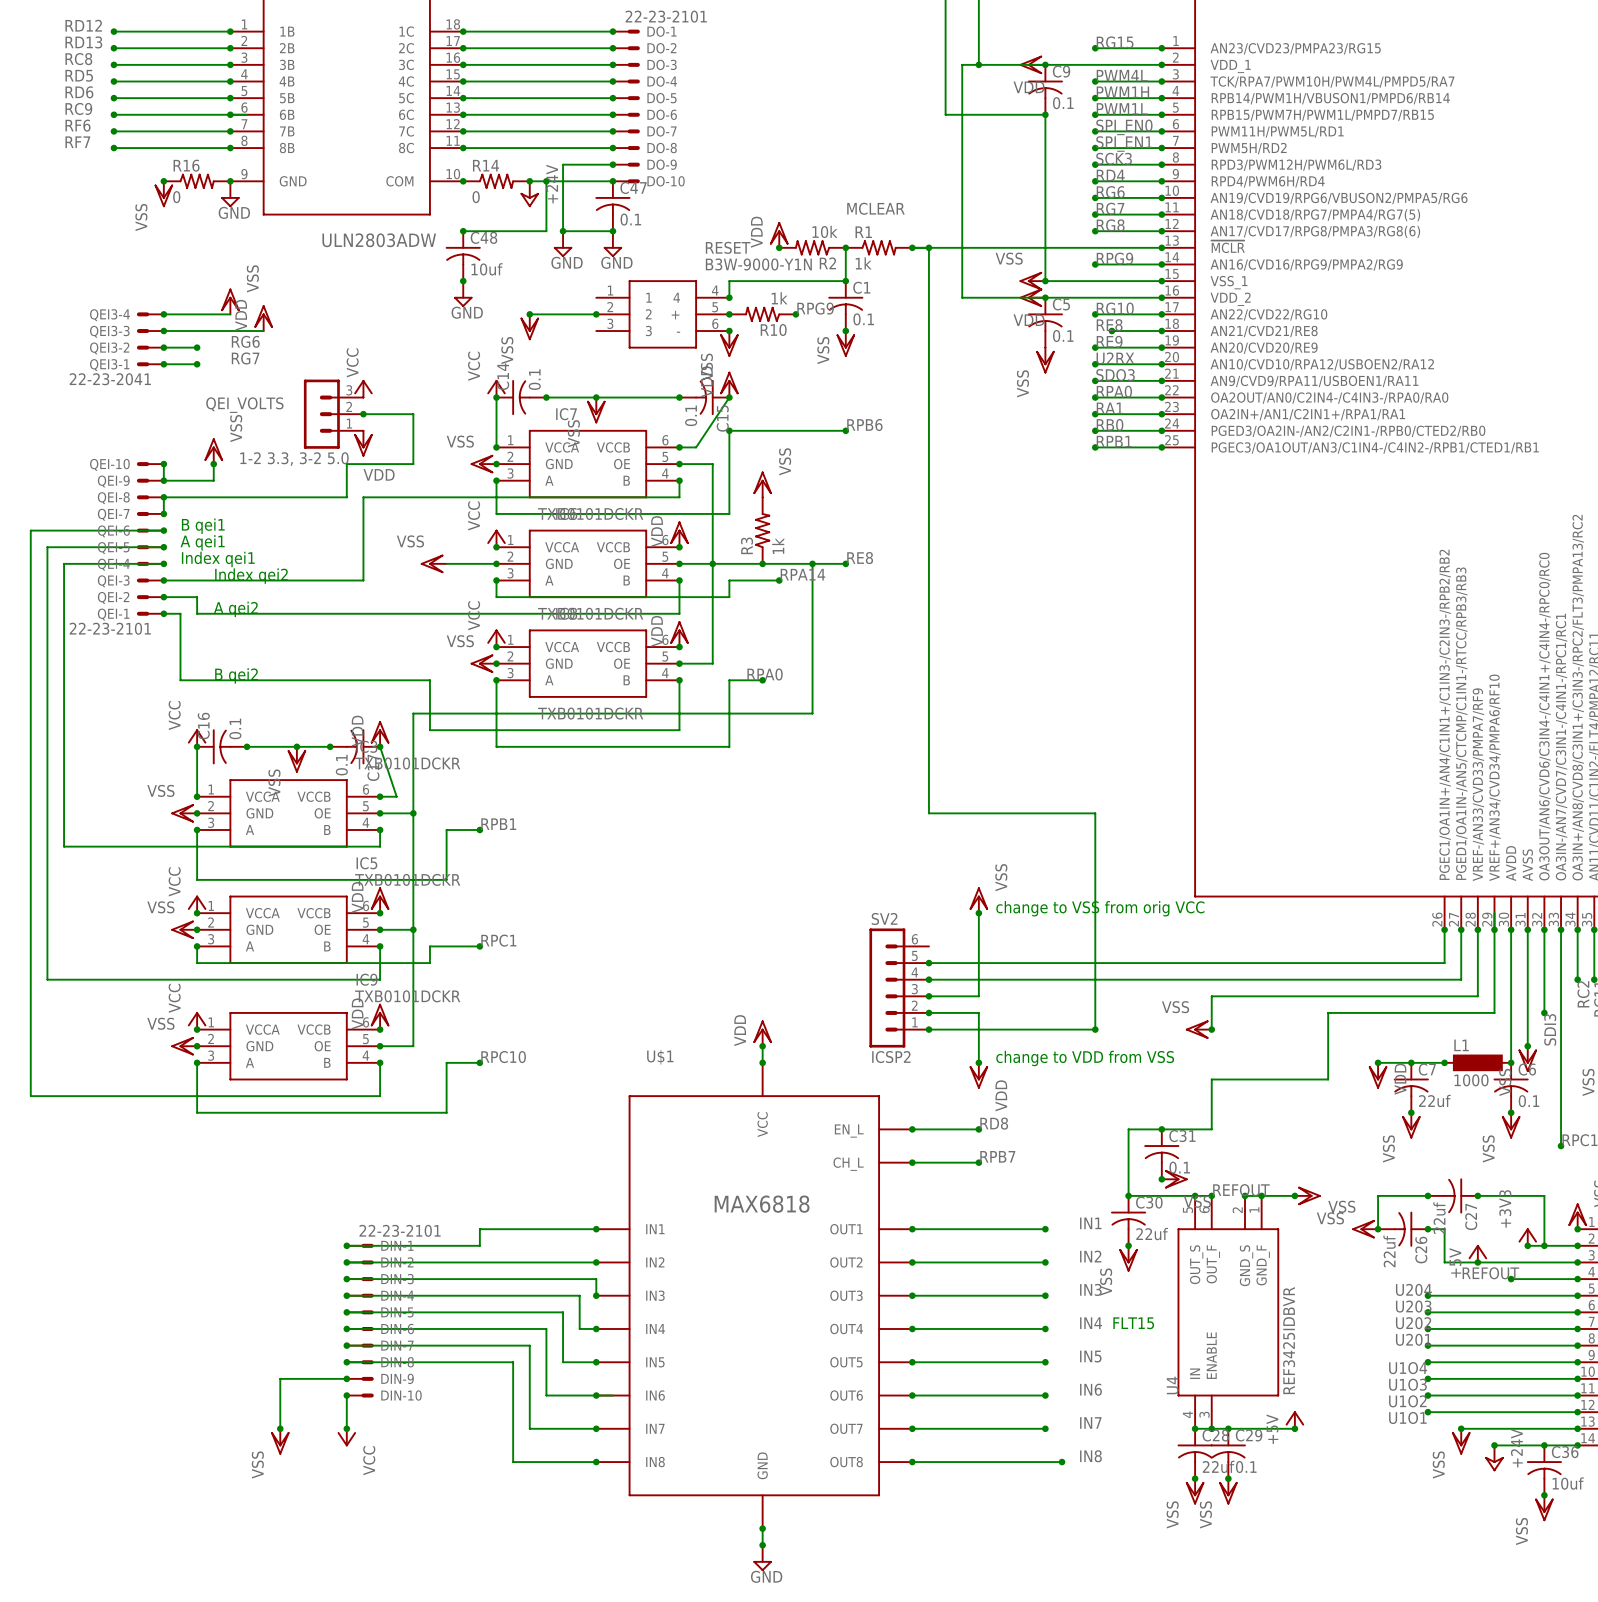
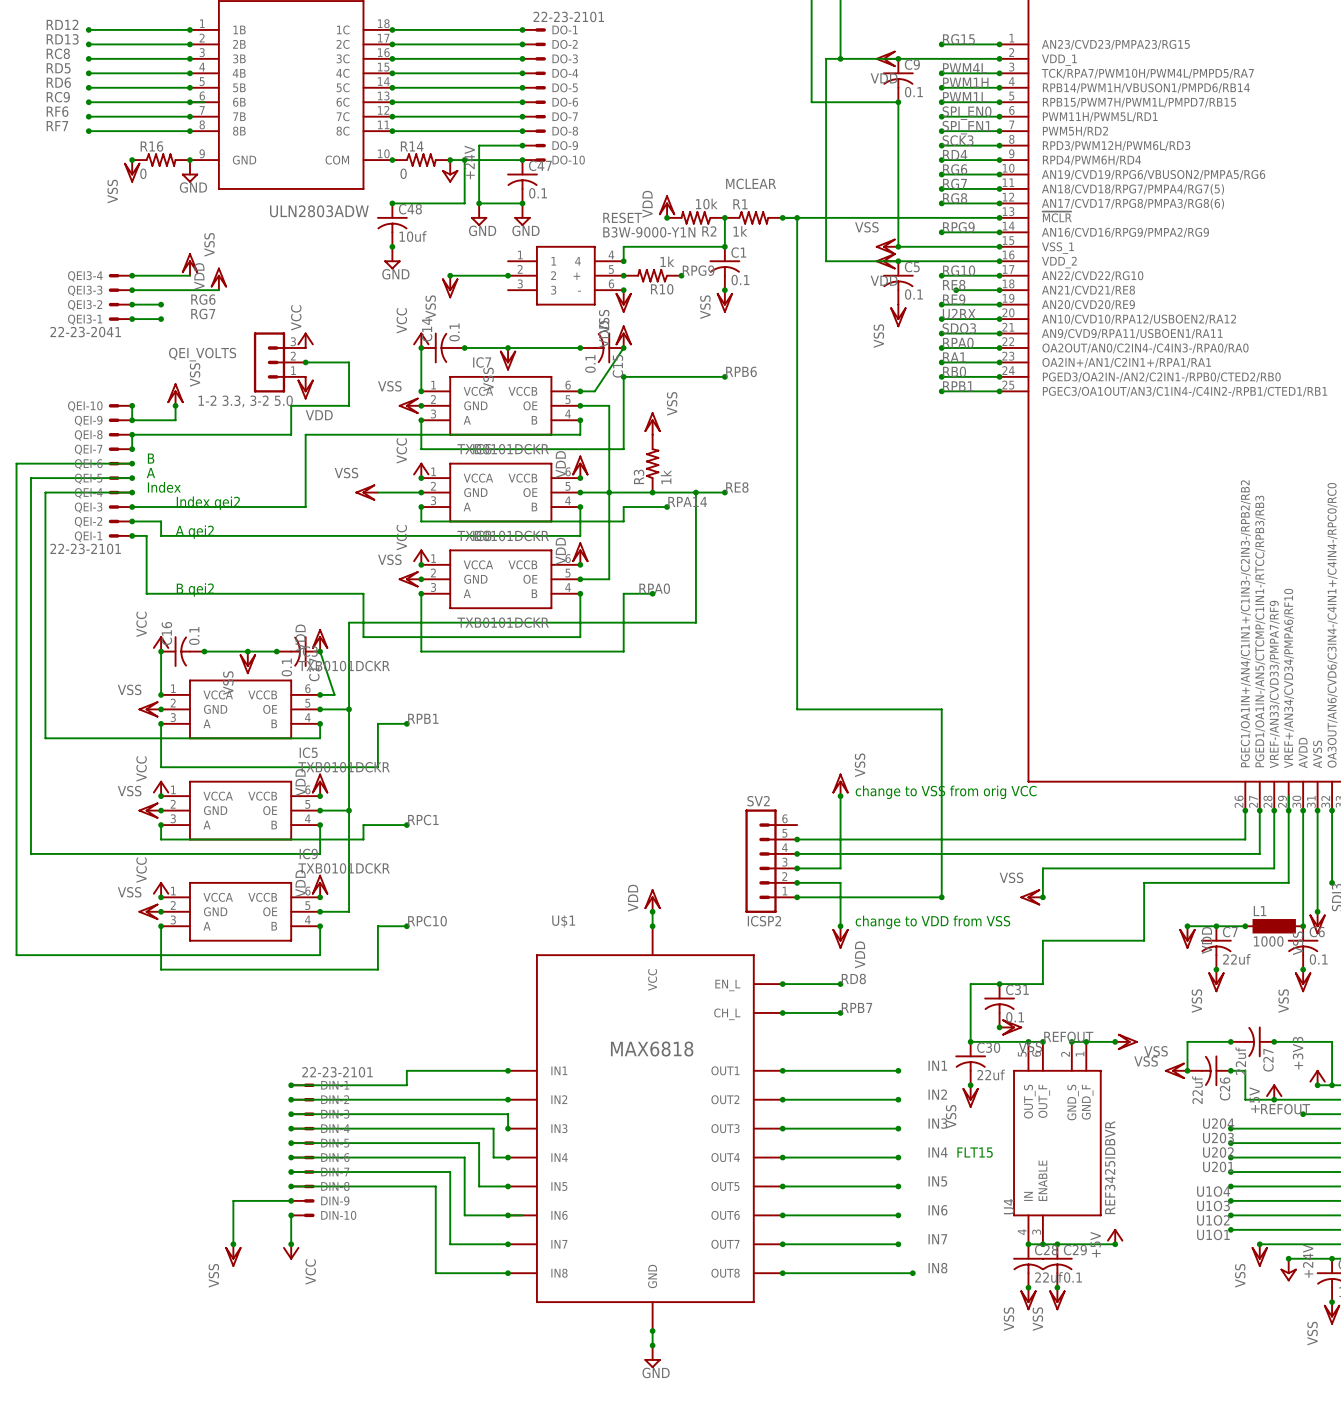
text: B qei1 (203, 526) -> B (151, 458)
text: A qei1 (202, 542) -> A (150, 473)
text: Index qei1 (218, 559) -> Index (164, 487)

